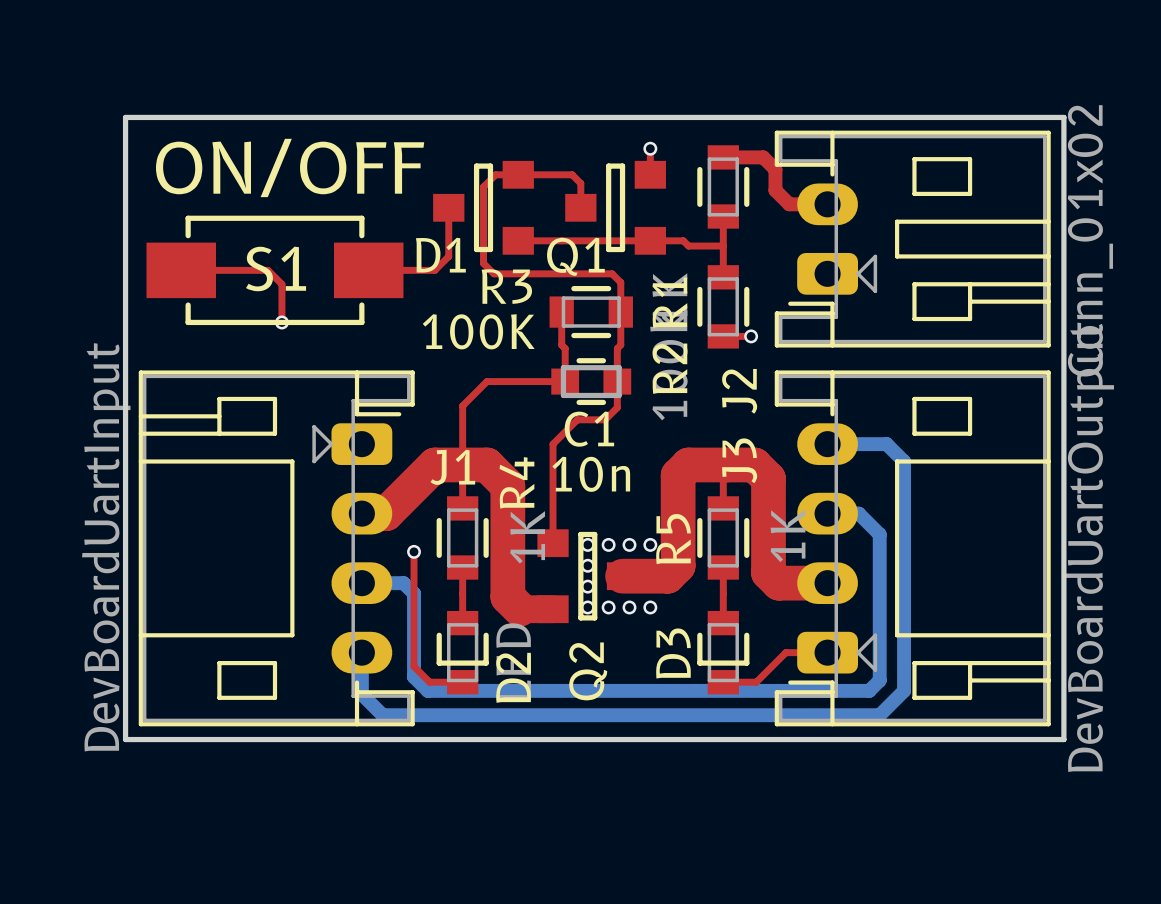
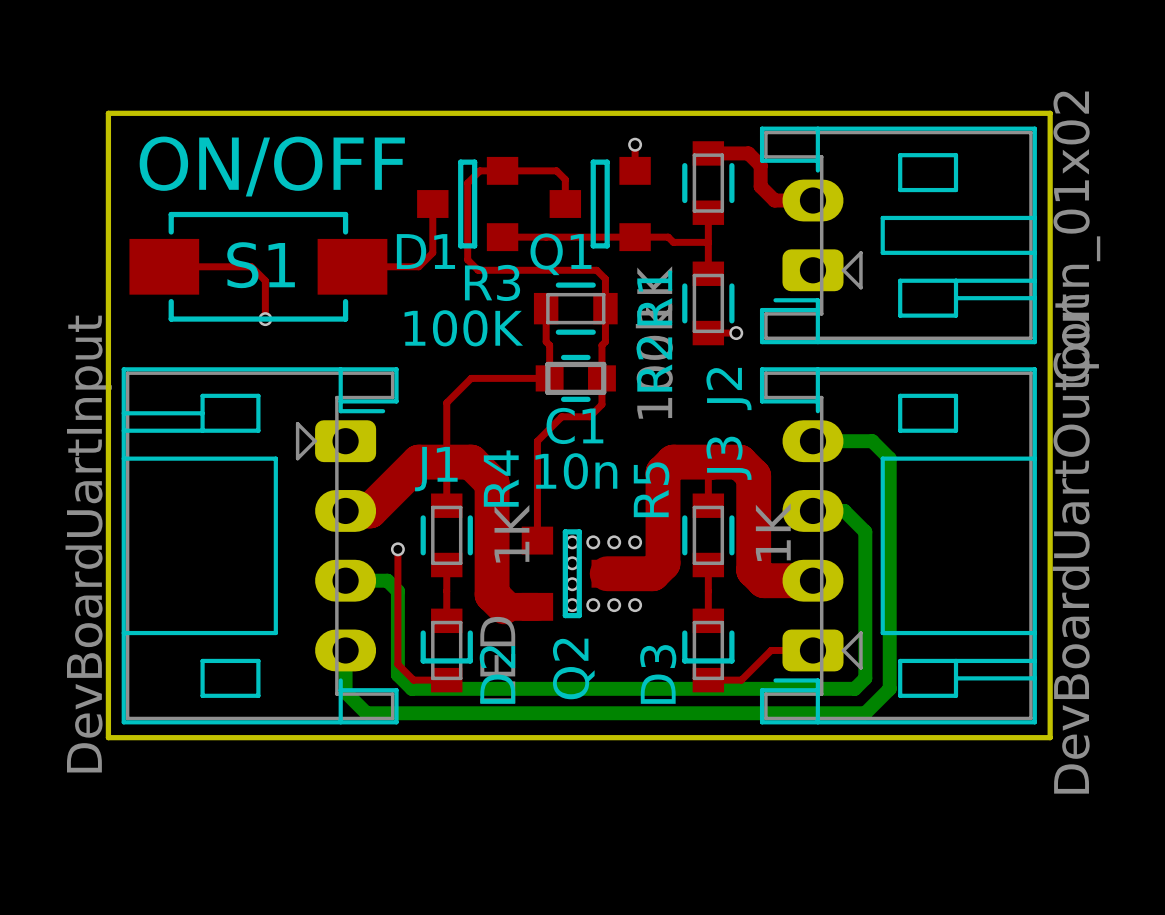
R5 name position: R5 (673, 539) -> R5 (651, 489)
D3 name position: D3 (673, 653) -> D3 (658, 674)

